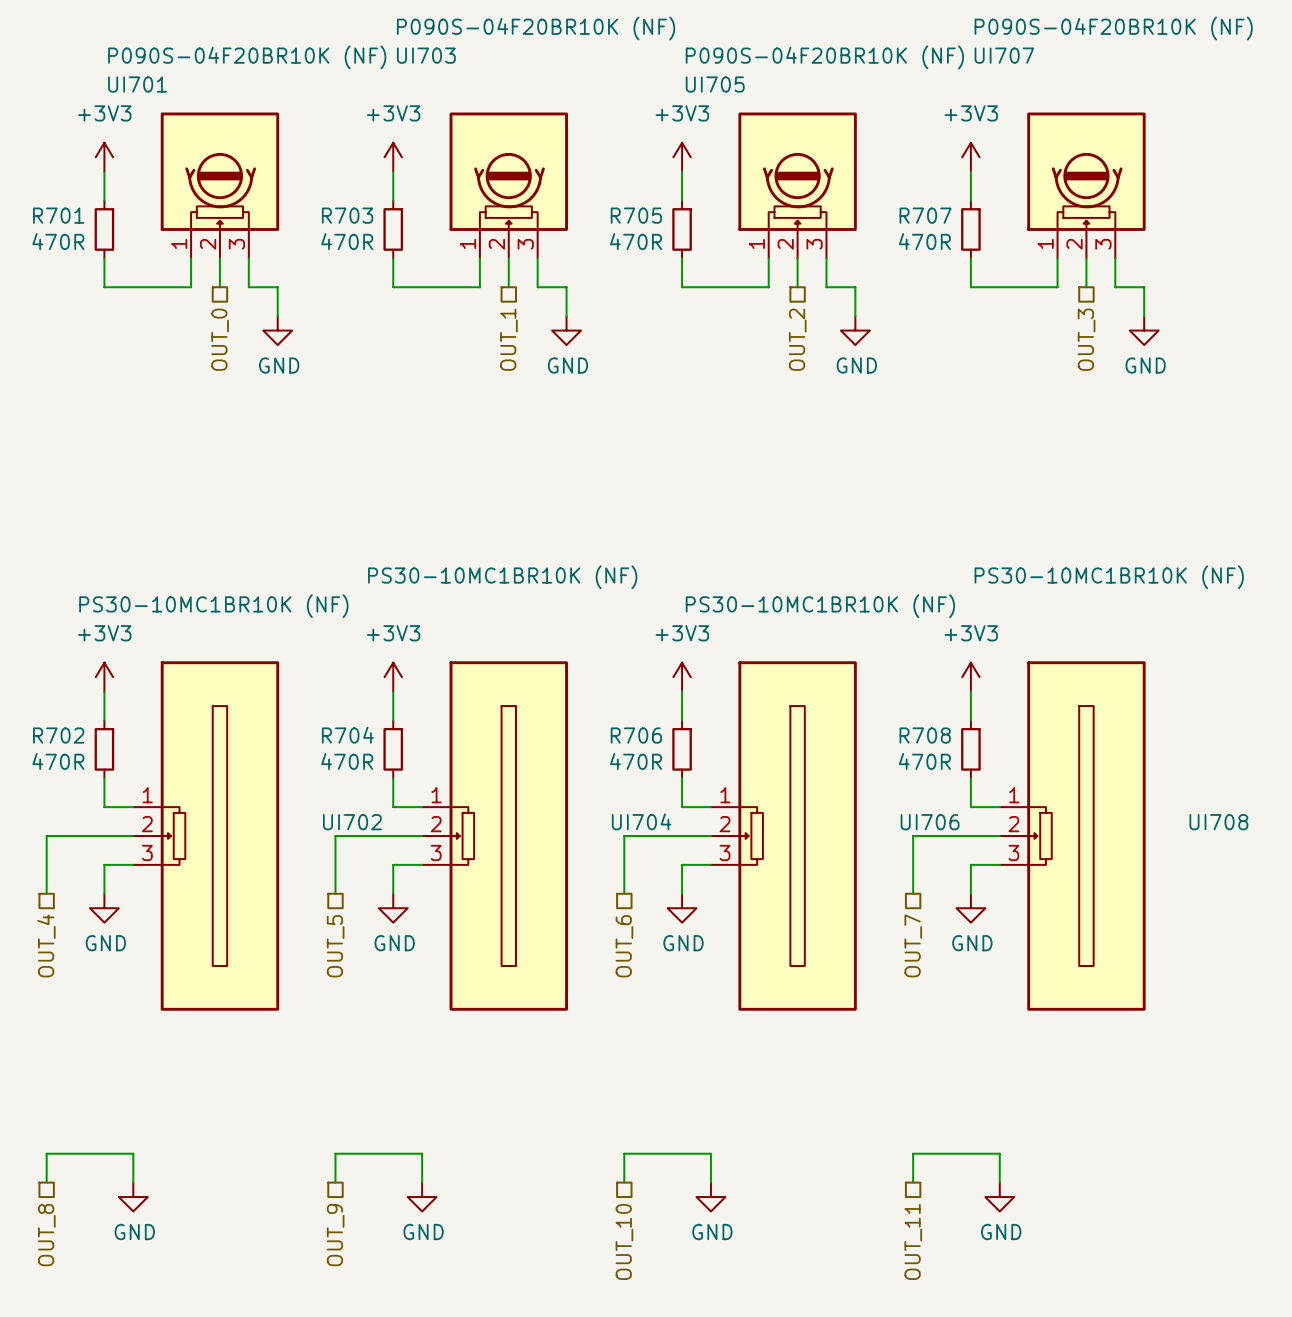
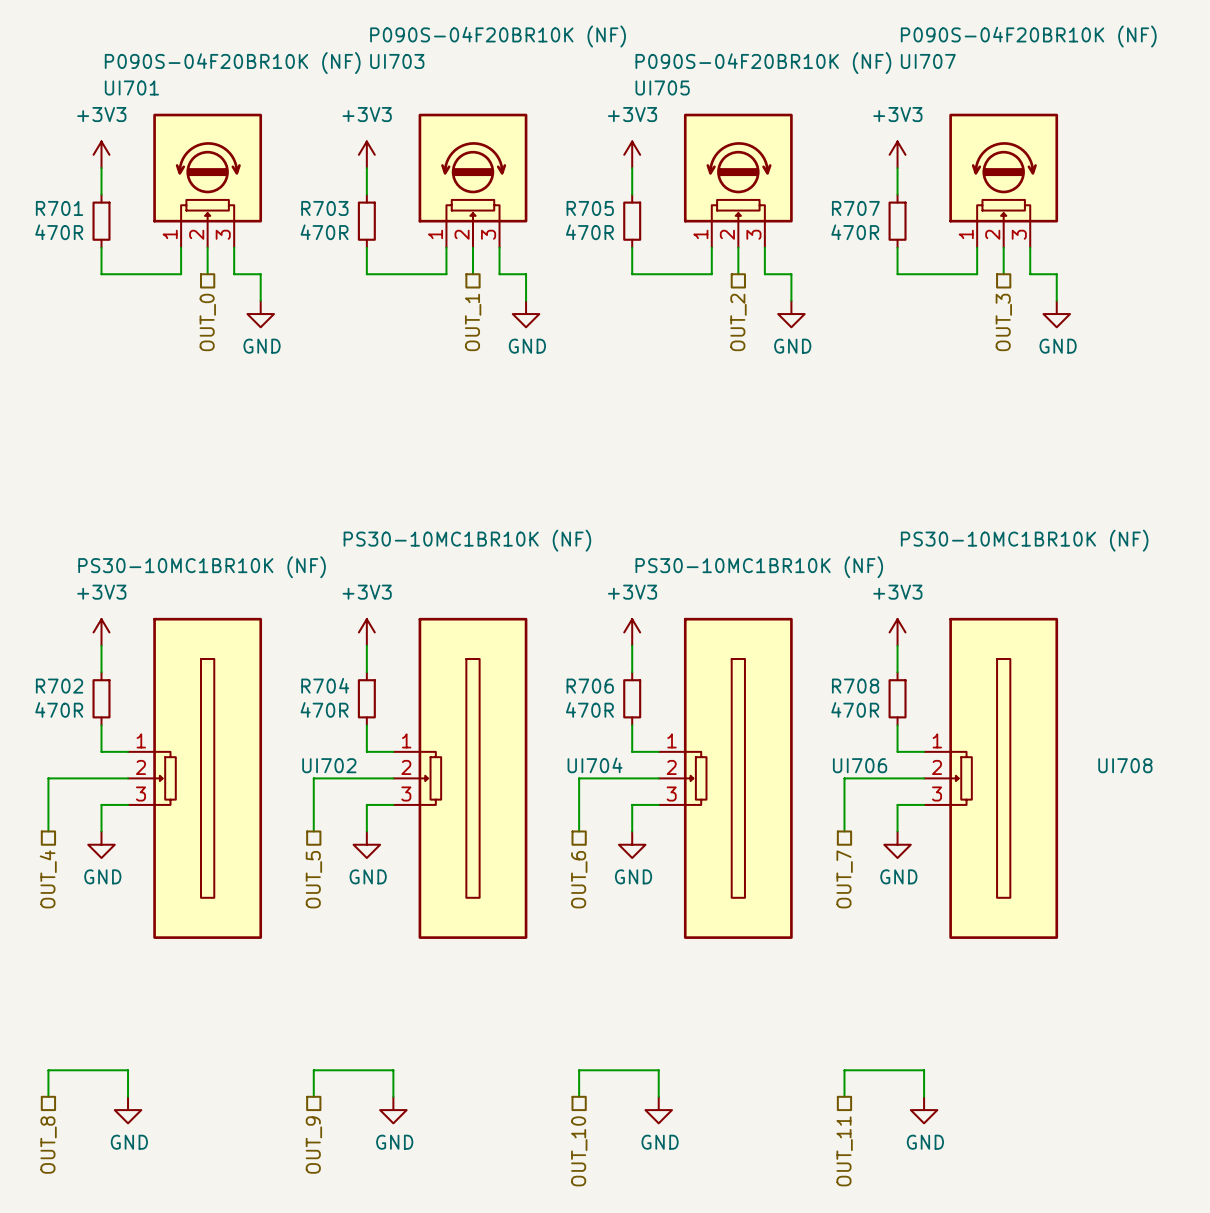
UI701 symbol: [160, 112, 280, 259] -> [153, 113, 263, 248]
UI703 symbol: [449, 112, 568, 259] -> [418, 113, 528, 248]
UI705 symbol: [738, 112, 857, 259] -> [683, 113, 793, 248]
UI707 symbol: [1027, 112, 1146, 259] -> [949, 113, 1059, 248]

